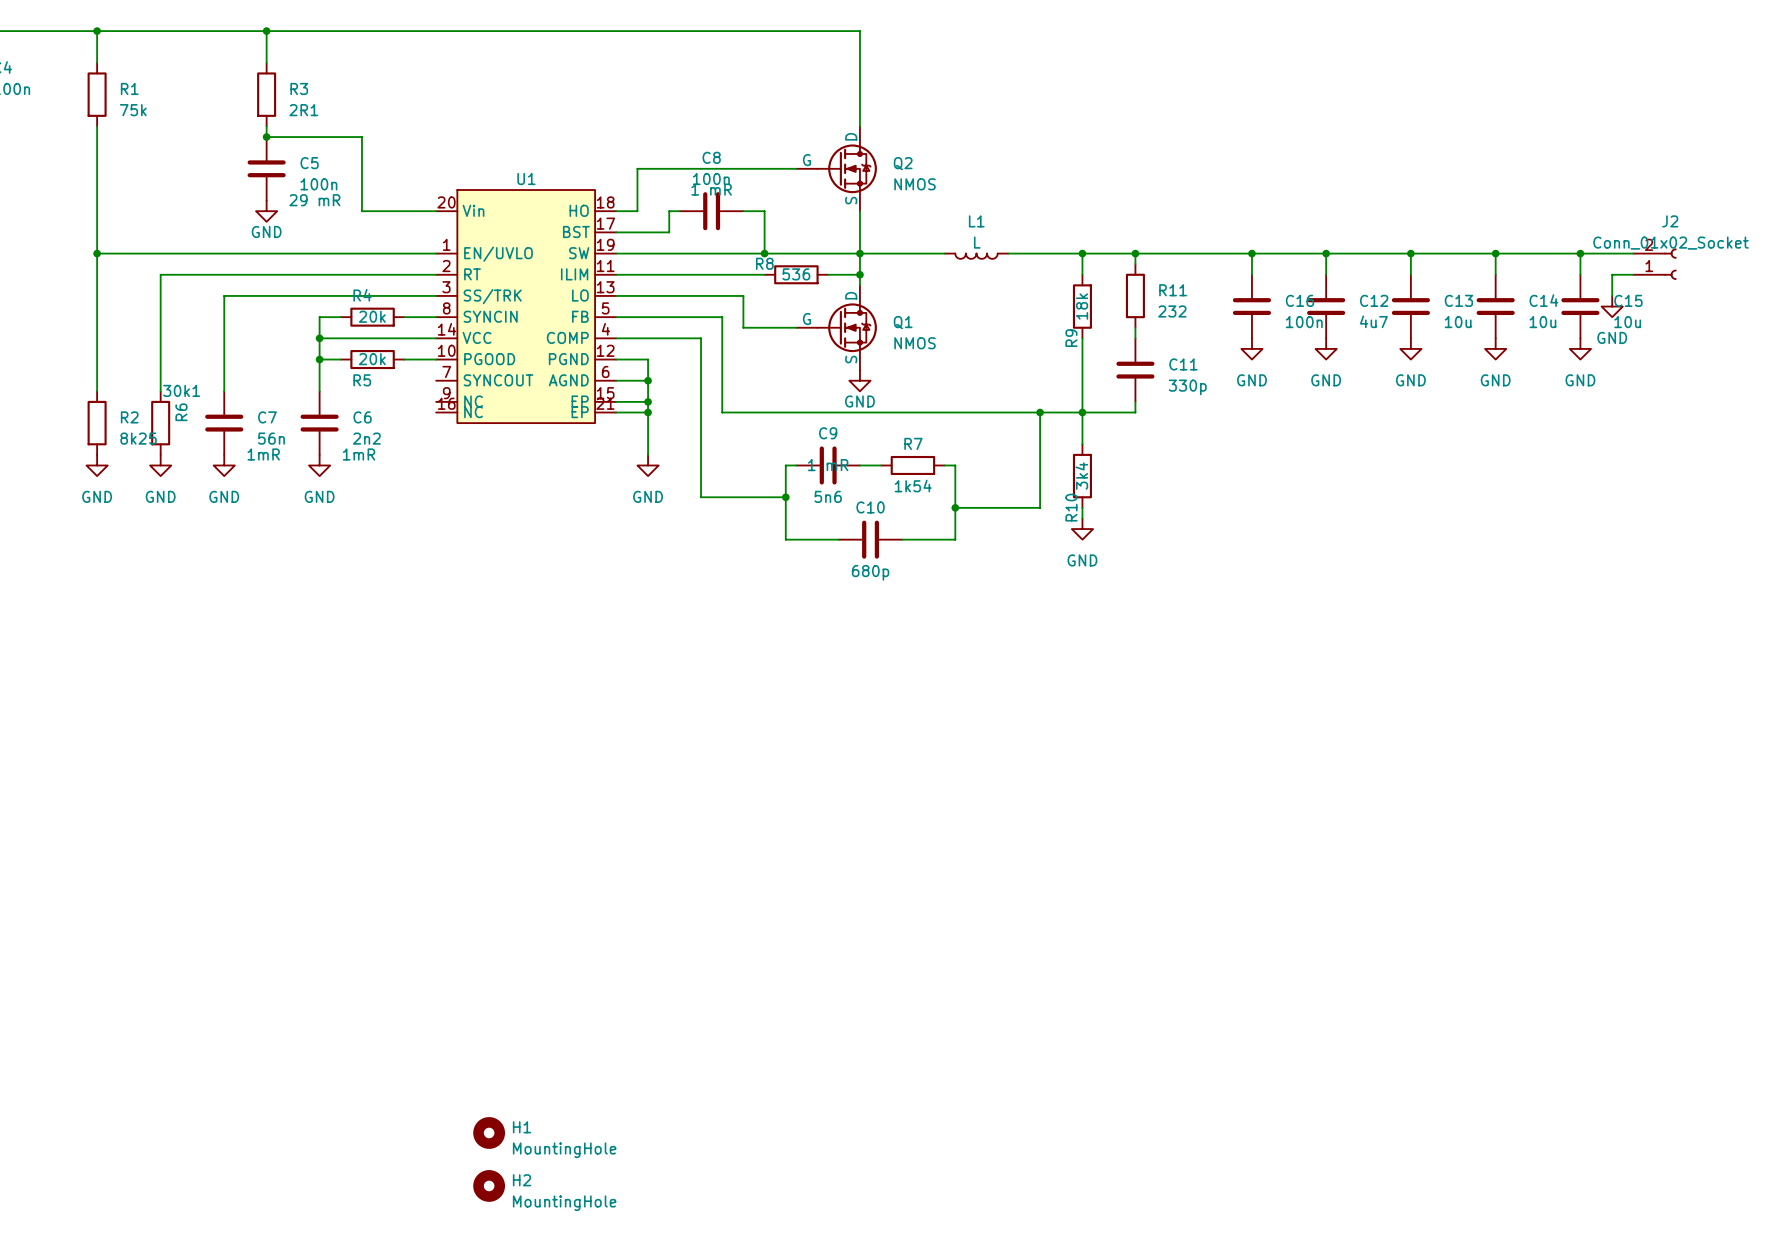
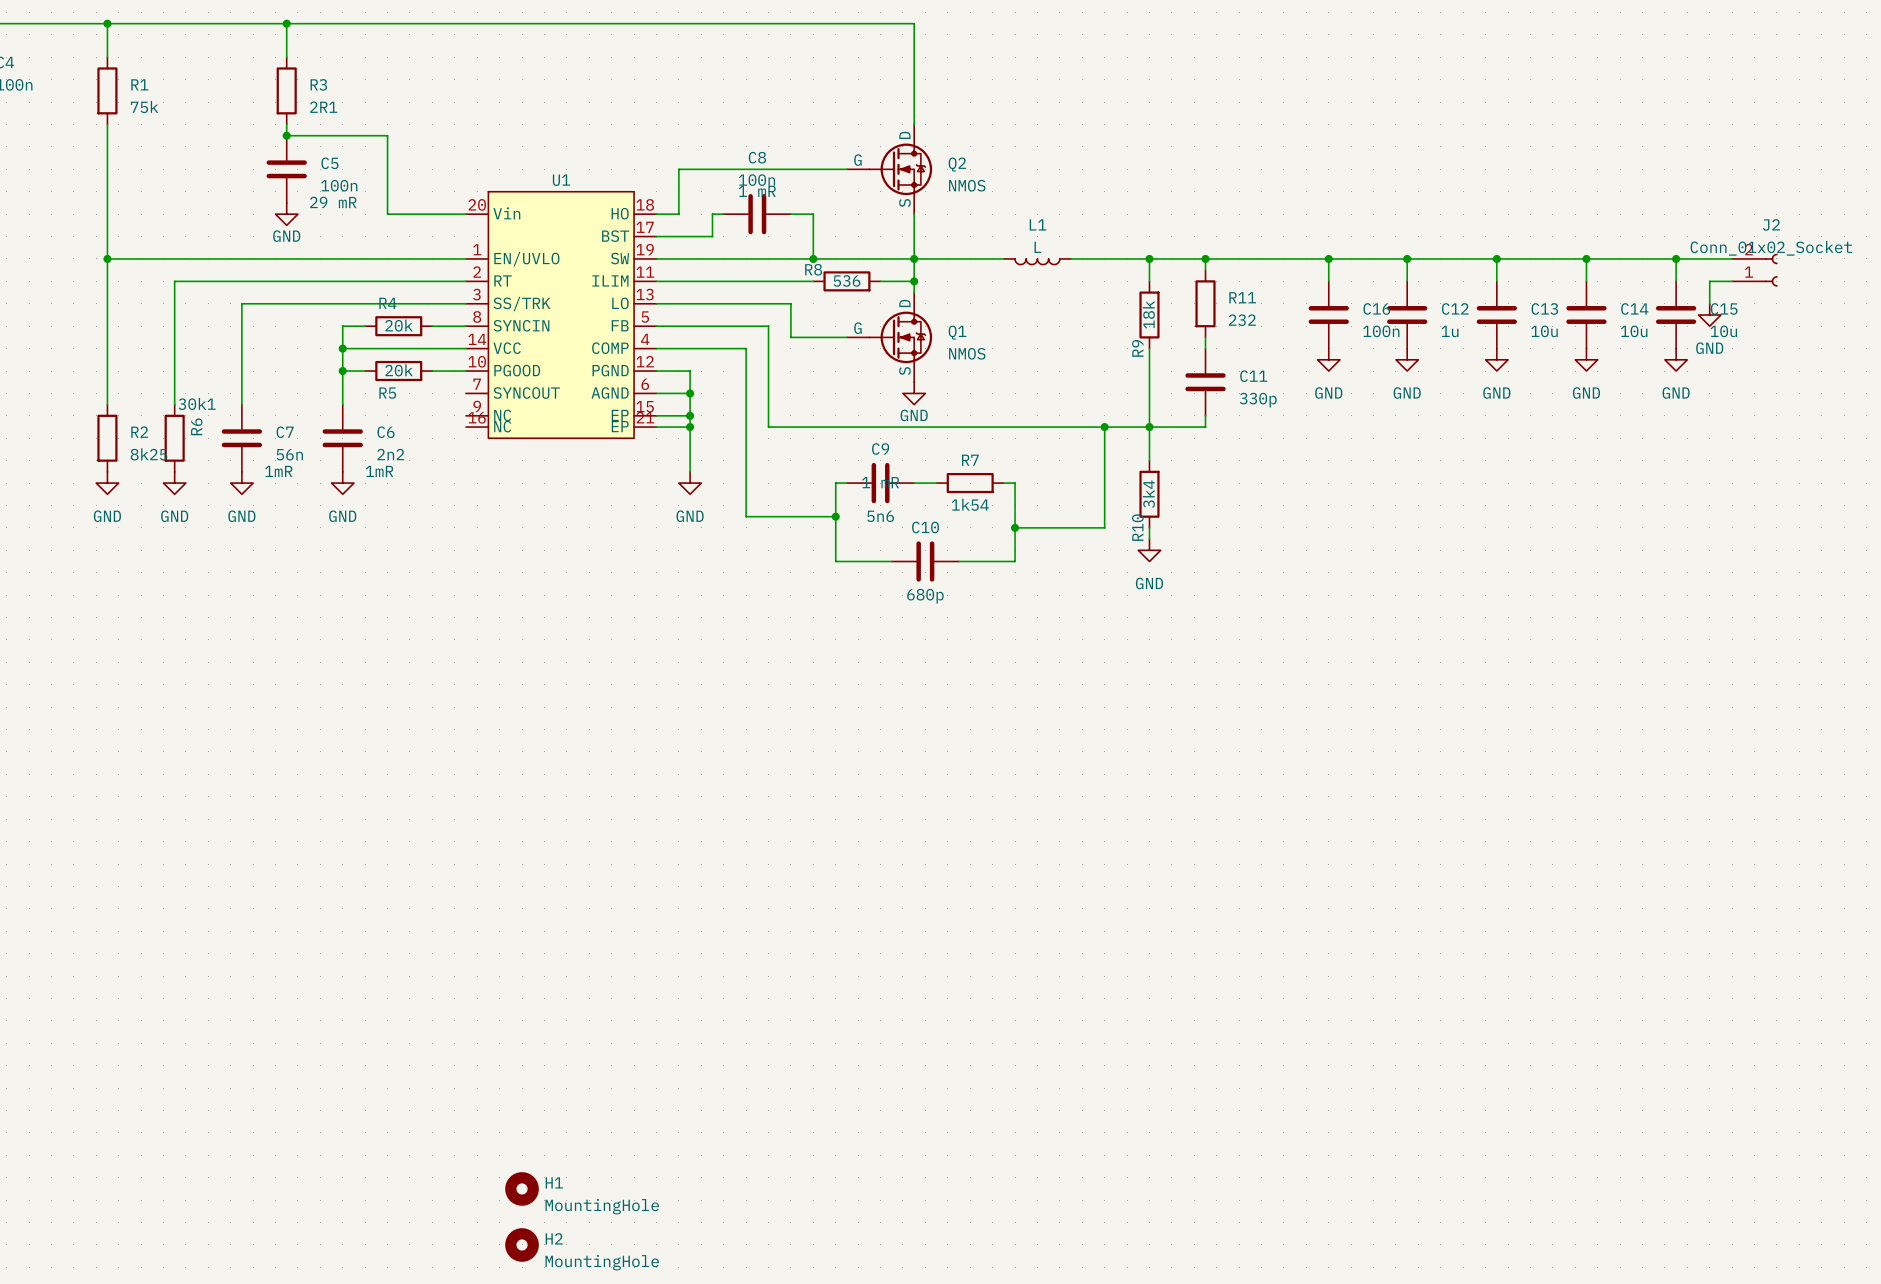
C12 value: 4u7 (1373, 321) -> 1u (1450, 331)

